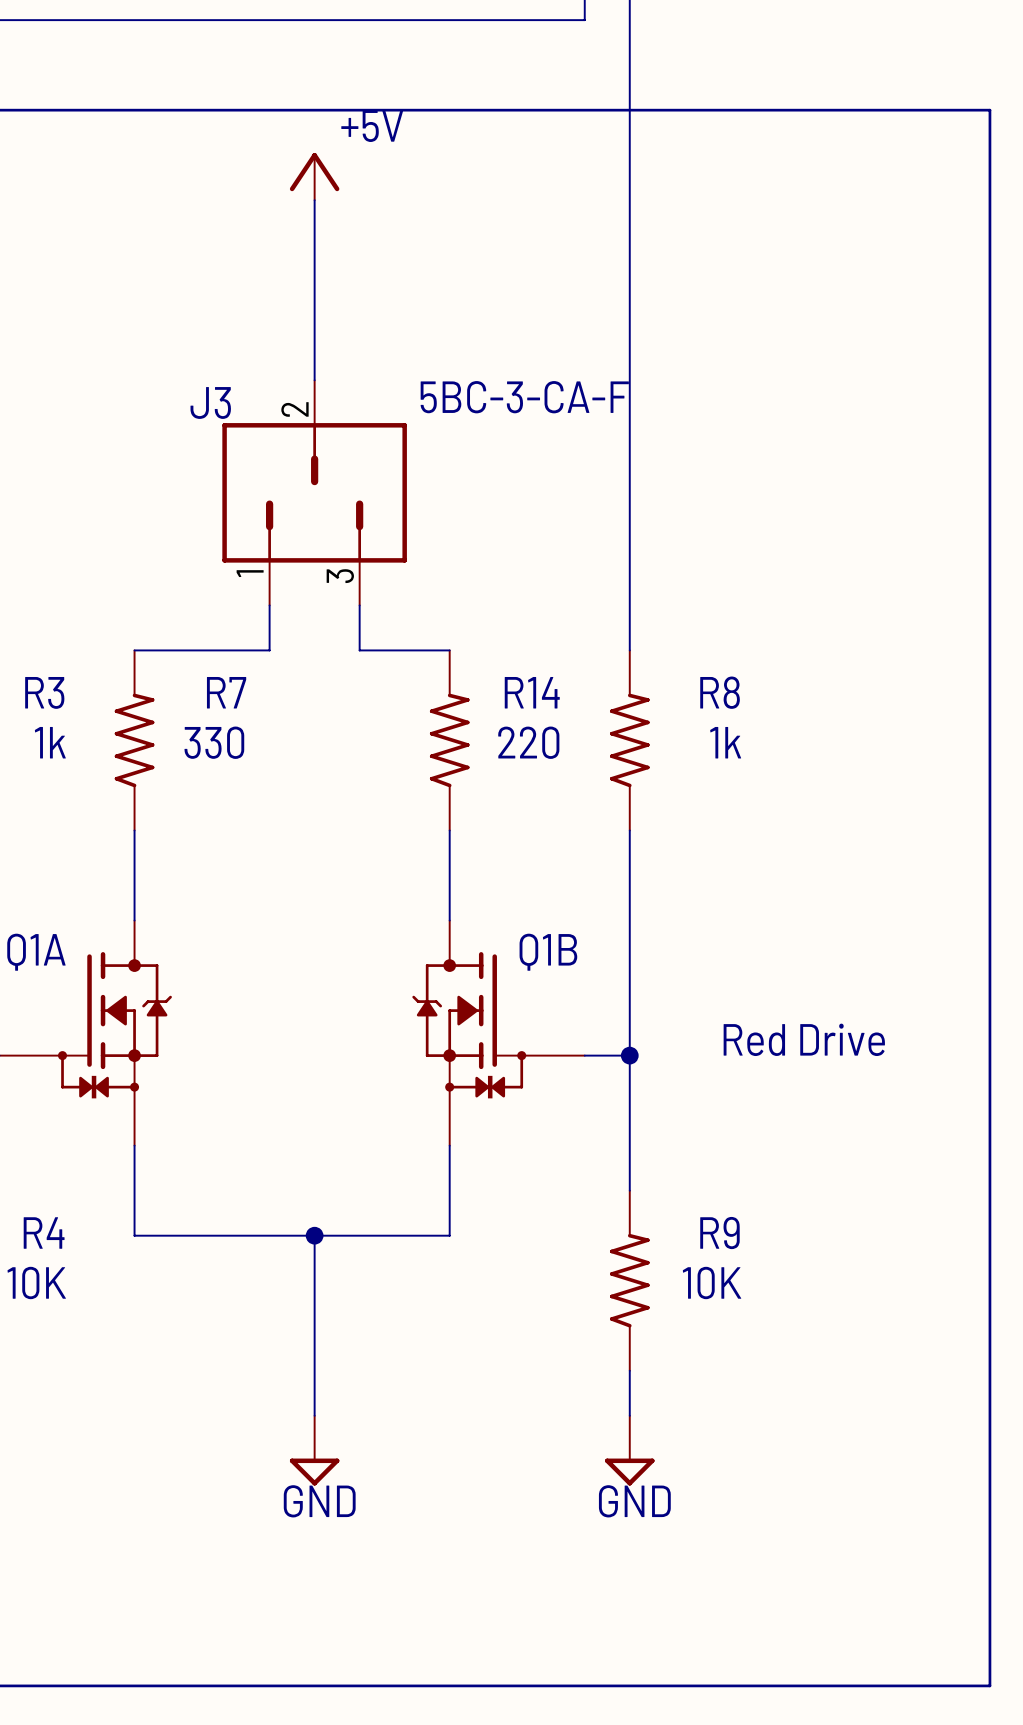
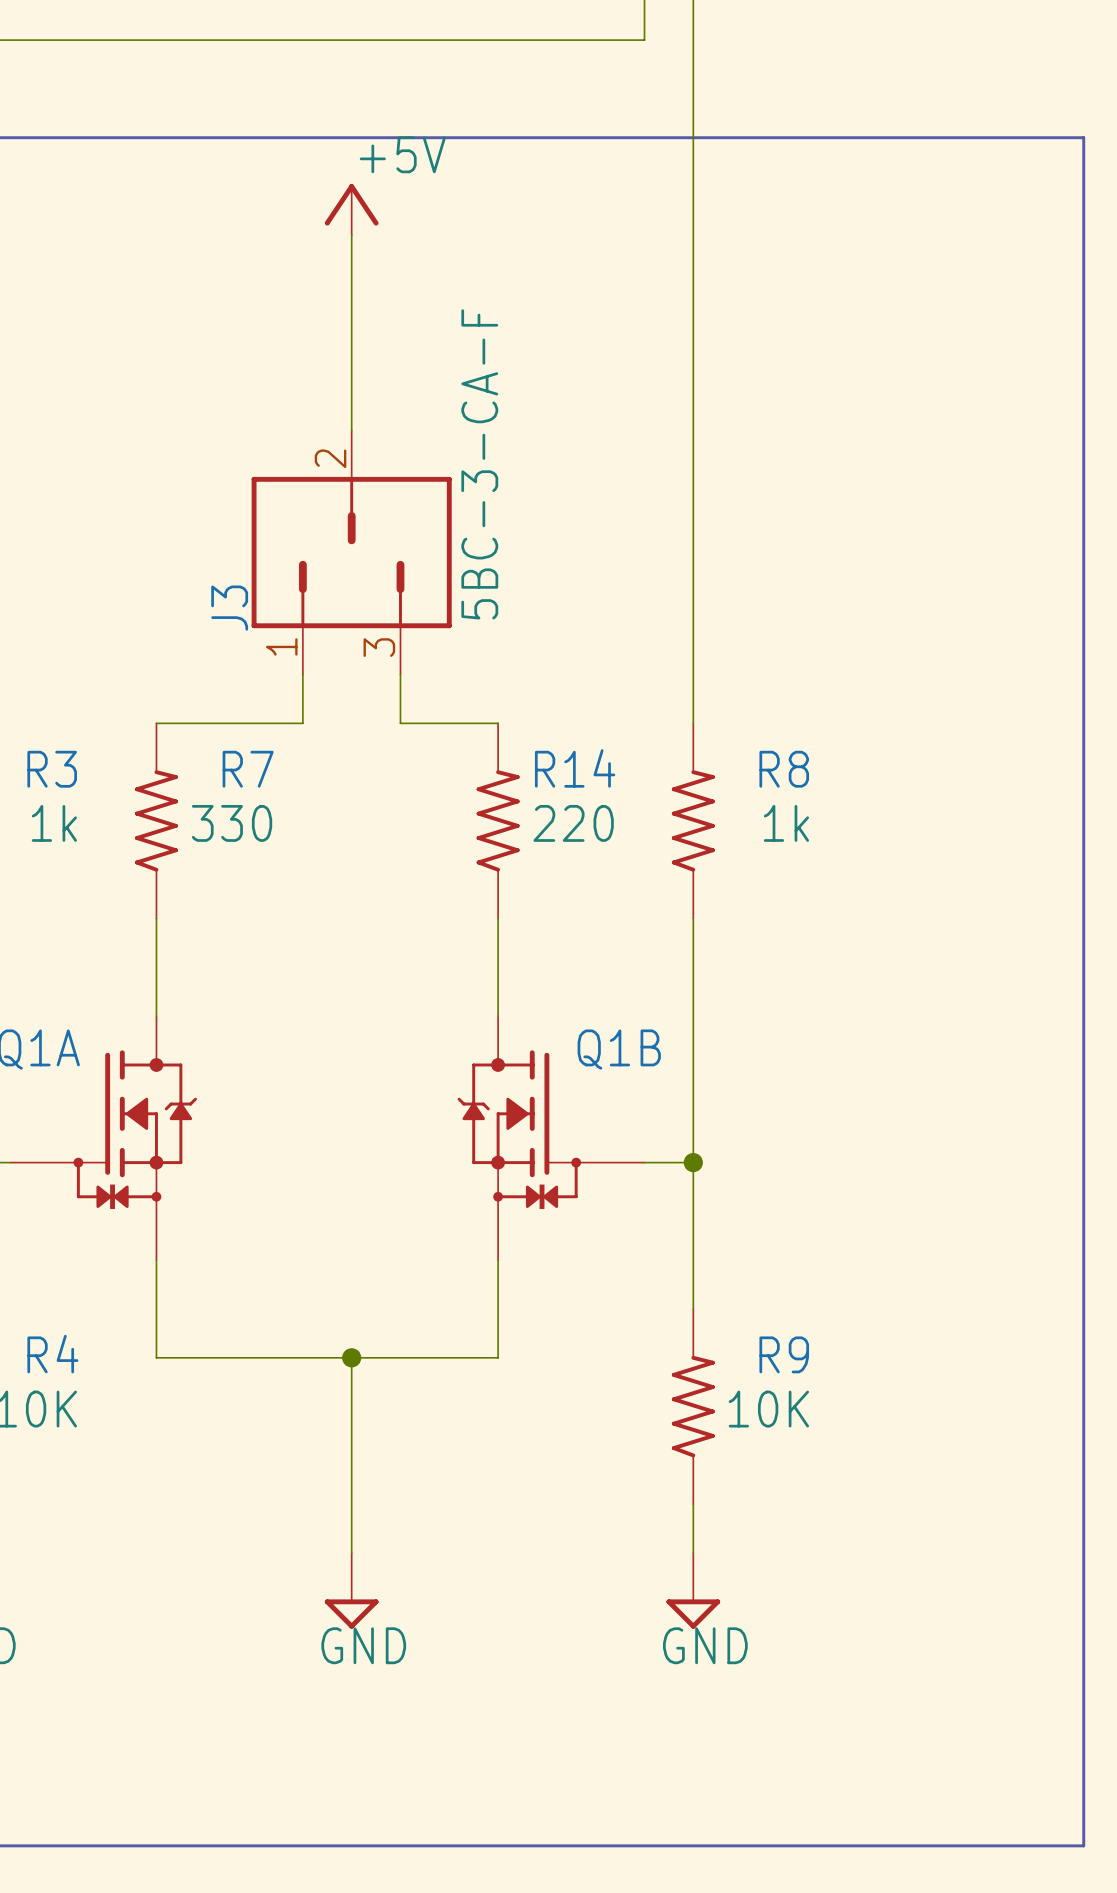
J3 value rotation: 0° (524, 397) -> 90° counterclockwise (479, 464)
J3 name rotation: 0° (210, 402) -> 90° counterclockwise (229, 608)
J3 name position: J3 (210, 402) -> J3 (229, 608)
text: Red Drive (804, 1039) -> none

